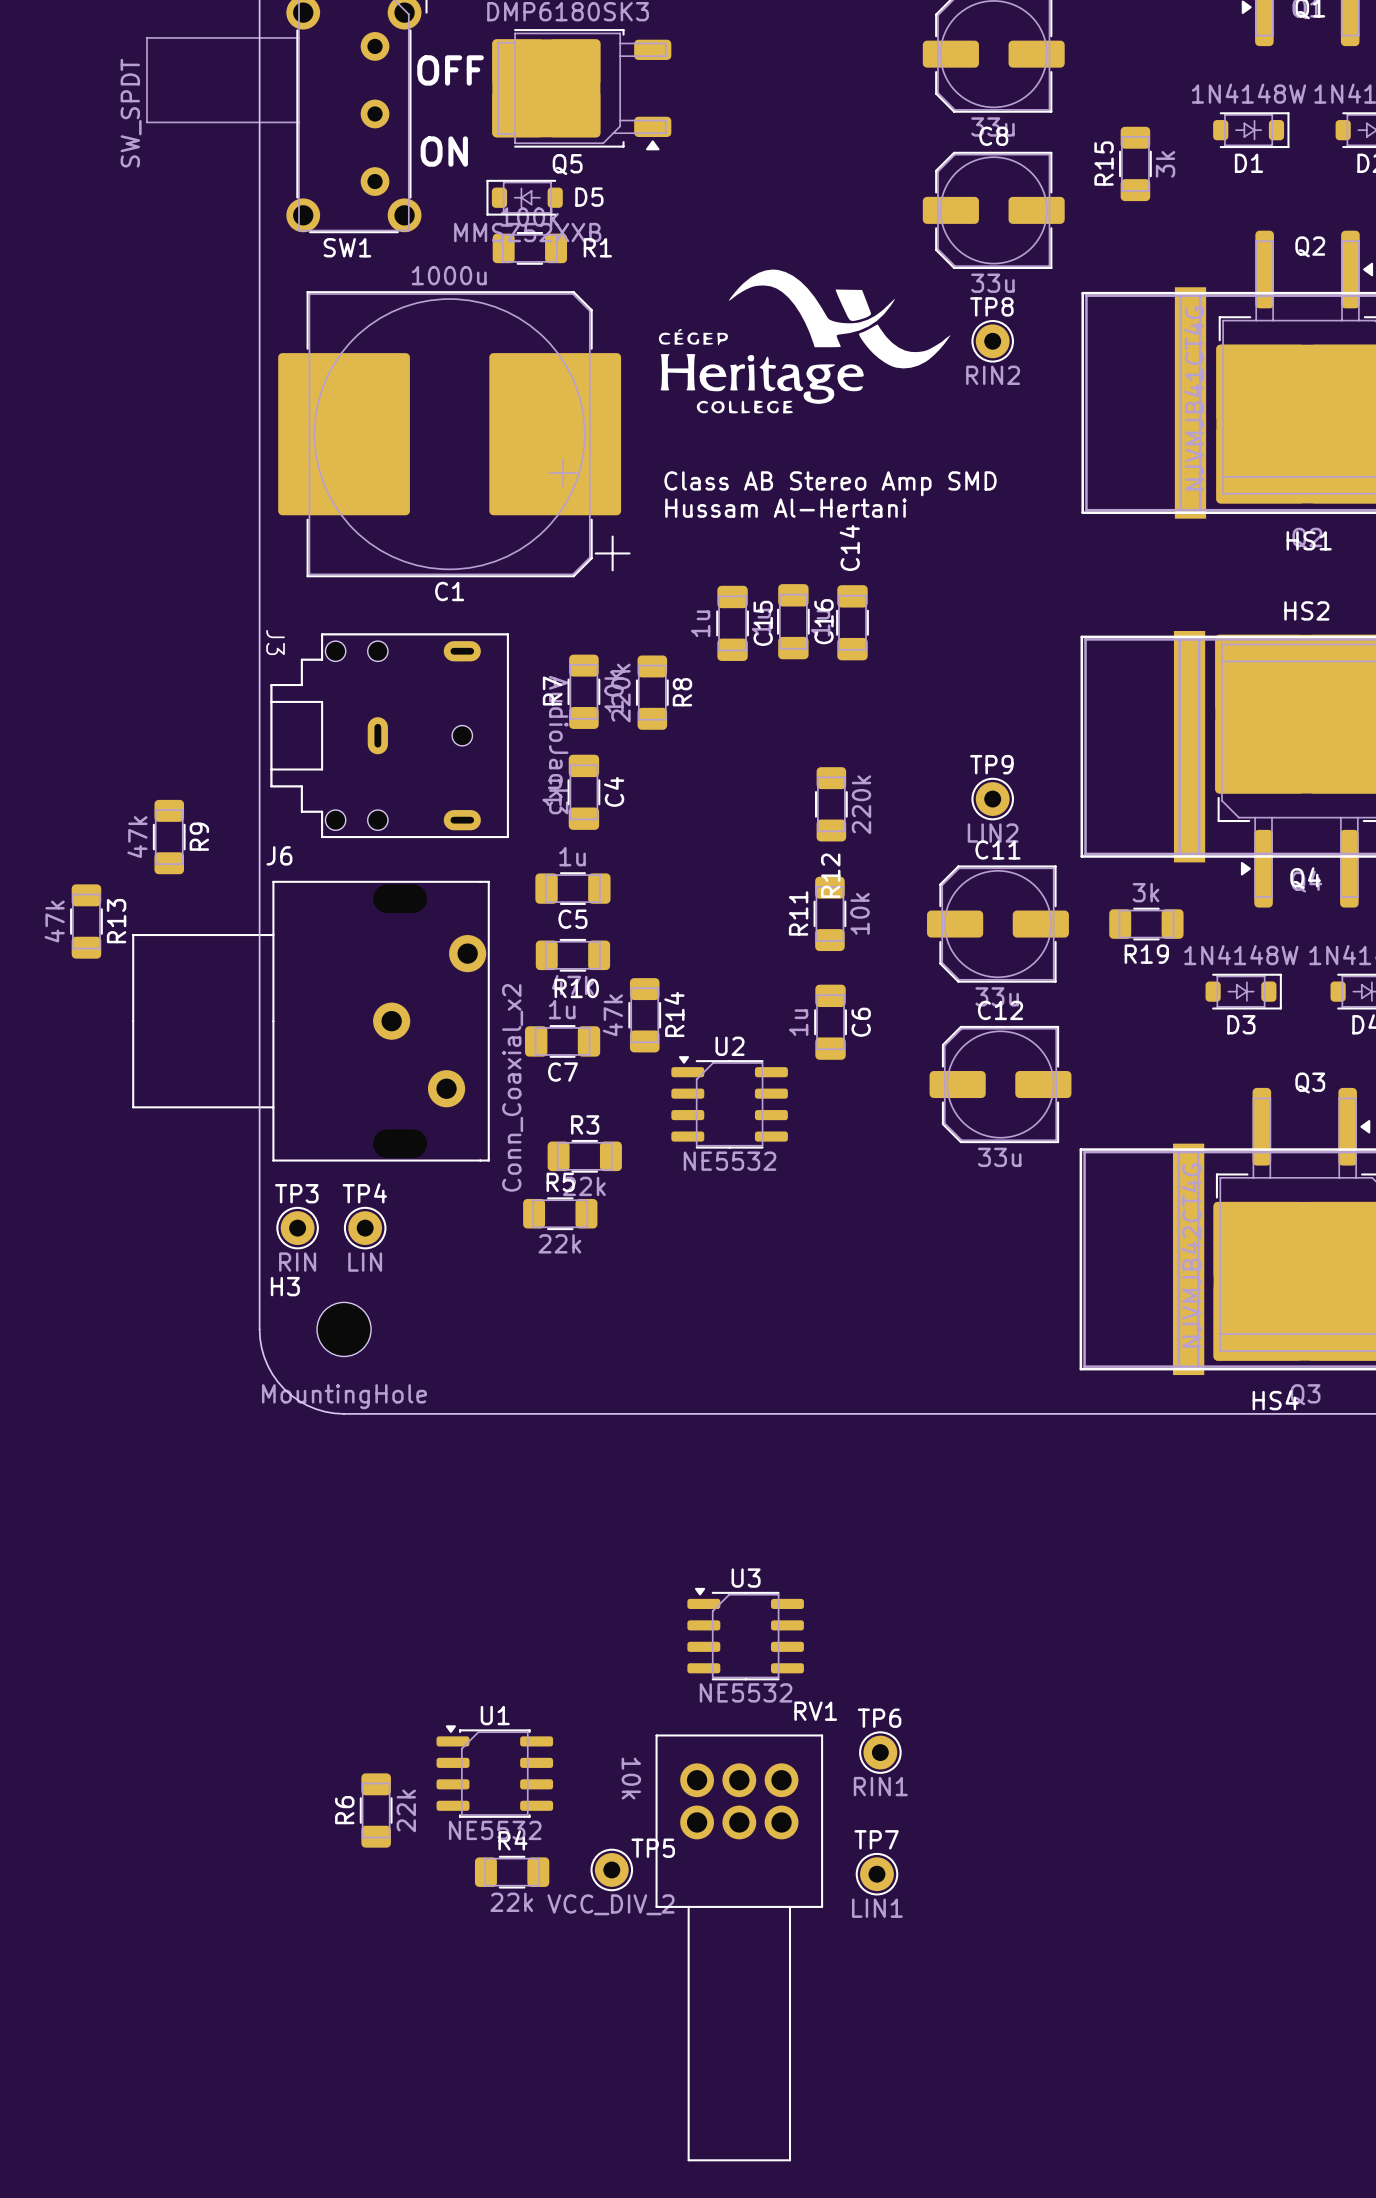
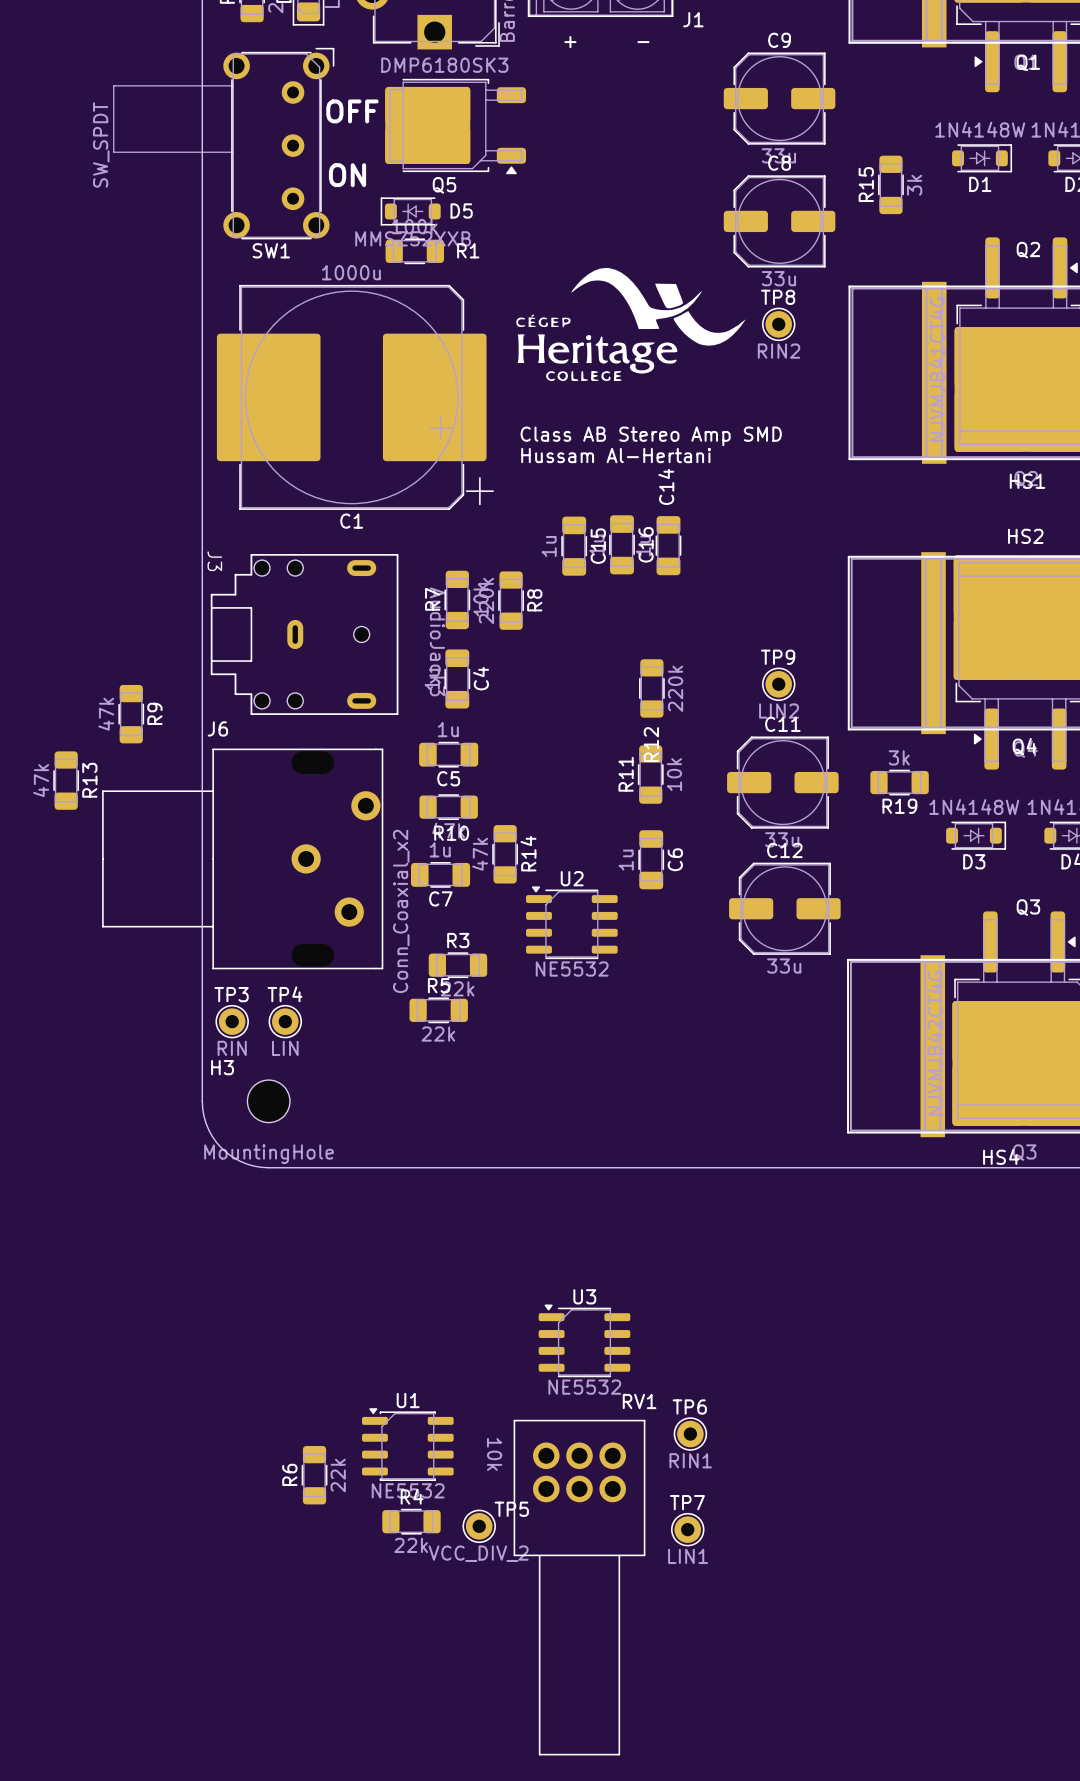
U1 position: (494, 1771) -> (407, 1444)
R6 position: (376, 1810) -> (314, 1475)
R4 position: (512, 1872) -> (411, 1521)

